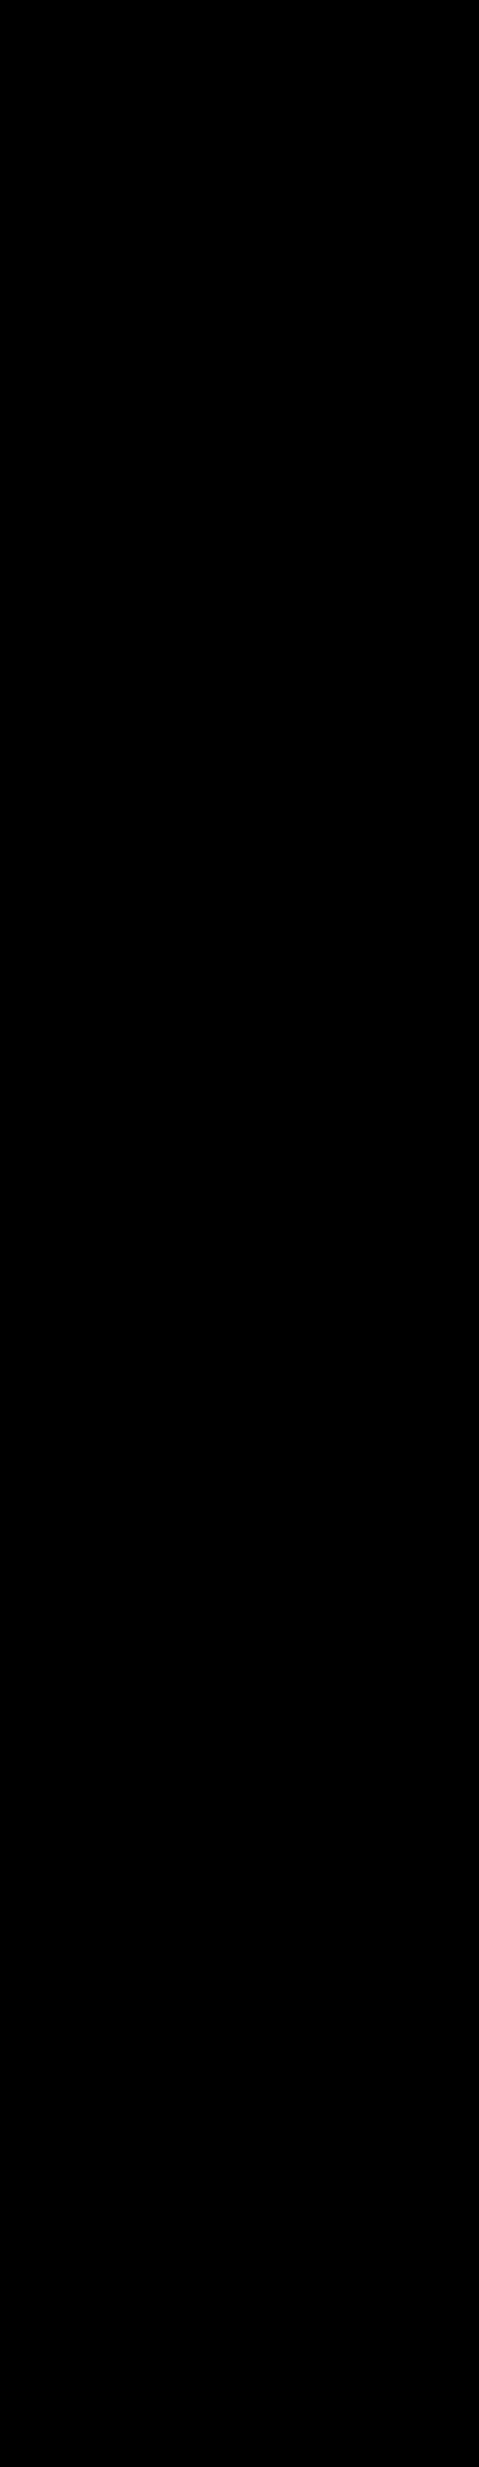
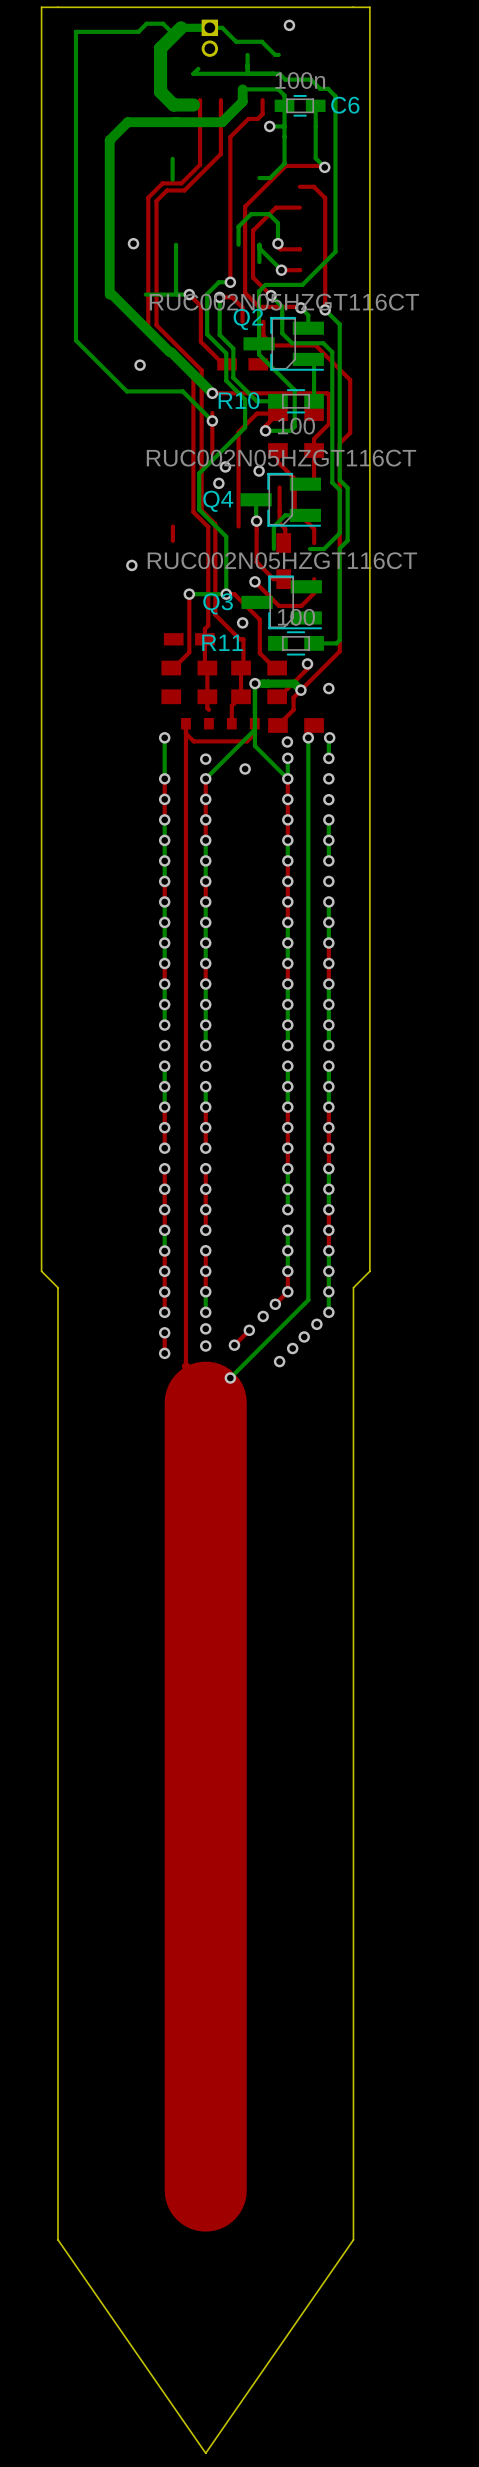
board edge: none -> (369, 7) (41, 7) (41, 1271) (57, 1287) (57, 2239) (205, 2453) (353, 2239) (353, 1287) (369, 1271) (369, 7)
via: none -> (289, 25)
bottom track: none -> (172, 31) (163, 23) (146, 23) (138, 31) (76, 31) (75, 340) (126, 391) (182, 391) (212, 420)
part: none -> (209, 38)
bottom track: none -> (247, 54) (247, 73)
bottom track: none -> (278, 54) (275, 54) (261, 41) (236, 41) (222, 27) (181, 27) (160, 48) (160, 91) (173, 104) (193, 104)
bottom track: none -> (198, 68) (193, 73) (279, 73) (285, 79) (310, 79) (320, 88) (328, 88) (335, 96) (335, 251) (302, 284) (265, 284) (259, 291) (259, 354) (294, 390) (294, 426) (290, 430) (265, 430)
top track: none -> (200, 100) (200, 164) (181, 183) (162, 183) (148, 197) (148, 327) (193, 372) (193, 512) (208, 526) (208, 625) (204, 628) (204, 665) (207, 668) (207, 708) (209, 709)
top track: none -> (220, 100) (220, 154) (184, 190) (167, 190) (156, 201) (156, 325) (201, 370) (201, 510) (215, 524) (215, 614) (239, 639) (243, 639) (241, 696) (231, 705) (231, 723)
top track: none -> (262, 100) (262, 114) (257, 118) (248, 118) (230, 136) (230, 282)
C6: none -> 100n (300, 105)
bottom track: none -> (315, 105) (315, 158) (324, 167)
via: none -> (269, 126)
bottom track: none -> (284, 126) (269, 126)
bottom track: none -> (172, 158) (172, 179)
top track: none -> (324, 167) (285, 165) (245, 206) (245, 293) (258, 306) (300, 307)
via: none -> (324, 167)
bottom track: none -> (259, 178) (270, 178) (284, 163) (284, 95) (278, 89) (242, 89) (242, 101) (222, 122) (127, 122) (109, 140) (109, 294) (112, 294) (212, 393)
top track: none -> (299, 186) (313, 186) (325, 198) (325, 309)
top track: none -> (299, 207) (276, 207) (253, 230) (253, 277) (271, 295)
via: none -> (133, 243)
bottom track: none -> (277, 243) (277, 223) (269, 214) (251, 214) (238, 226) (238, 244)
top track: none -> (277, 243) (280, 249) (299, 249)
via: none -> (277, 243)
bottom track: none -> (176, 244) (176, 292) (177, 294)
bottom track: none -> (259, 244) (259, 262)
bottom track: none -> (259, 248) (281, 270)
via: none -> (281, 270)
top track: none -> (299, 270) (281, 270)
bottom track: none -> (230, 282) (218, 282) (207, 294) (207, 334) (226, 353) (226, 380) (245, 399) (245, 427) (199, 473) (199, 509) (226, 536) (226, 594) (189, 594)
via: none -> (230, 282)
bottom track: none -> (189, 294) (145, 294)
top track: none -> (189, 294) (200, 306) (200, 341) (223, 364) (227, 364)
via: none -> (189, 294)
bottom track: none -> (271, 295) (282, 306) (282, 333) (292, 343) (323, 343) (332, 352) (332, 482) (339, 490) (339, 533) (323, 549) (309, 549)
via: none -> (271, 295)
bottom track: none -> (219, 297) (219, 334) (233, 348) (233, 377) (256, 401) (277, 401)
top track: none -> (219, 297) (232, 297) (242, 307) (242, 321)
via: none -> (219, 297)
bottom track: none -> (300, 307) (308, 315) (308, 328)
via: none -> (300, 307)
bottom track: none -> (325, 309) (339, 324) (339, 480) (347, 487) (347, 540) (339, 548) (339, 640) (336, 643) (314, 643)
via: none -> (325, 309)
top track: none -> (263, 321) (263, 335) (273, 345) (315, 345) (350, 379) (350, 432) (339, 443) (339, 651) (293, 697) (293, 709) (279, 725)
Q2: none -> RUC002N05HZGT116CT (283, 343)
bottom track: none -> (308, 359) (314, 365) (314, 401)
part: none -> (242, 364)
via: none -> (140, 365)
top track: none -> (212, 393) (327, 393) (328, 424) (314, 438) (314, 487)
via: none -> (212, 393)
R10: none -> 100 (296, 401)
top track: none -> (212, 412) (212, 453)
part: none -> (296, 413)
via: none -> (212, 420)
top track: none -> (265, 430) (265, 426) (277, 413) (256, 413) (238, 431) (238, 526)
via: none -> (265, 430)
top track: none -> (277, 450) (277, 462) (294, 478) (294, 509) (314, 529) (314, 543)
part: none -> (296, 450)
via: none -> (225, 466)
via: none -> (259, 471)
via: none -> (218, 483)
top track: none -> (279, 487) (279, 523) (285, 529) (285, 545)
bottom track: none -> (256, 499) (256, 521)
Q4: none -> RUC002N05HZGT116CT (280, 499)
bottom track: none -> (305, 515) (285, 515) (273, 526) (273, 549)
top track: none -> (256, 521) (256, 562) (273, 579) (285, 579)
via: none -> (256, 521)
top track: none -> (172, 526) (172, 540)
part: none -> (283, 561)
via: none -> (131, 565)
top track: none -> (314, 579) (314, 593) (301, 605) (279, 605) (254, 581)
via: none -> (254, 581)
top track: none -> (189, 594) (189, 652) (173, 668) (171, 668)
via: none -> (189, 594)
top track: none -> (226, 594) (234, 594) (259, 619) (259, 653) (274, 668) (277, 668)
via: none -> (226, 594)
Q3: none -> RUC002N05HZGT116CT (281, 602)
via: none -> (242, 622)
part: none -> (189, 639)
R11: none -> 100 (296, 643)
top track: none -> (307, 663) (307, 668) (279, 696) (277, 696)
via: none -> (307, 663)
part: none -> (189, 668)
part: none -> (259, 668)
via: none -> (254, 683)
via: none -> (328, 688)
bottom track: none -> (300, 690) (294, 683) (254, 683) (254, 746) (287, 778) (287, 758)
via: none -> (300, 690)
part: none -> (189, 696)
part: none -> (259, 696)
top track: none -> (185, 723) (185, 1366) (222, 1402)
part: none -> (197, 723)
part: none -> (243, 723)
top track: none -> (254, 723) (254, 733) (247, 741) (193, 741) (185, 733)
part: none -> (296, 725)
bottom track: none -> (254, 729) (205, 778)
bottom track: none -> (164, 737) (164, 778)
via: none -> (164, 737)
bottom track: none -> (308, 737) (308, 1300) (230, 1378)
via: none -> (308, 737)
bottom track: none -> (329, 737) (328, 758)
via: none -> (329, 737)
via: none -> (287, 741)
via: none -> (287, 758)
via: none -> (328, 758)
via: none -> (205, 759)
via: none -> (245, 768)
top track: none -> (164, 778) (164, 819)
via: none -> (164, 778)
top track: none -> (205, 778) (205, 840)
via: none -> (205, 778)
top track: none -> (287, 778) (287, 840)
via: none -> (287, 778)
via: none -> (328, 778)
via: none -> (164, 799)
via: none -> (205, 799)
via: none -> (287, 799)
via: none -> (328, 799)
bottom track: none -> (164, 819) (164, 881)
via: none -> (164, 819)
via: none -> (205, 819)
via: none -> (287, 819)
bottom track: none -> (328, 819) (328, 860)
via: none -> (328, 819)
via: none -> (164, 840)
bottom track: none -> (205, 840) (205, 881)
via: none -> (205, 840)
bottom track: none -> (287, 840) (287, 860)
via: none -> (287, 840)
via: none -> (328, 840)
via: none -> (164, 860)
via: none -> (205, 860)
top track: none -> (287, 860) (287, 922)
via: none -> (287, 860)
via: none -> (328, 860)
top track: none -> (164, 881) (164, 901)
via: none -> (164, 881)
top track: none -> (205, 881) (205, 901)
via: none -> (205, 881)
via: none -> (287, 881)
via: none -> (328, 881)
bottom track: none -> (164, 901) (164, 963)
via: none -> (164, 901)
bottom track: none -> (205, 901) (205, 963)
via: none -> (205, 901)
via: none -> (287, 901)
bottom track: none -> (328, 901) (328, 943)
via: none -> (328, 901)
via: none -> (164, 922)
via: none -> (205, 922)
bottom track: none -> (287, 922) (287, 963)
via: none -> (287, 922)
via: none -> (328, 922)
via: none -> (164, 943)
via: none -> (205, 943)
via: none -> (287, 943)
top track: none -> (328, 943) (328, 984)
via: none -> (328, 943)
top track: none -> (164, 963) (164, 984)
via: none -> (164, 963)
top track: none -> (205, 963) (205, 984)
via: none -> (205, 963)
top track: none -> (287, 963) (287, 984)
via: none -> (287, 963)
via: none -> (328, 963)
bottom track: none -> (164, 984) (164, 1025)
via: none -> (164, 984)
bottom track: none -> (205, 984) (205, 1045)
via: none -> (205, 984)
bottom track: none -> (287, 984) (287, 1045)
via: none -> (287, 984)
bottom track: none -> (328, 984) (328, 1045)
via: none -> (328, 984)
via: none -> (164, 1004)
via: none -> (205, 1004)
via: none -> (287, 1004)
via: none -> (328, 1004)
via: none -> (164, 1025)
via: none -> (205, 1025)
via: none -> (287, 1025)
via: none -> (328, 1025)
via: none -> (164, 1045)
via: none -> (205, 1045)
via: none -> (287, 1045)
via: none -> (328, 1045)
bottom track: none -> (164, 1066) (164, 1107)
via: none -> (164, 1066)
via: none -> (205, 1066)
bottom track: none -> (287, 1066) (287, 1107)
via: none -> (287, 1066)
bottom track: none -> (328, 1066) (328, 1107)
via: none -> (328, 1066)
via: none -> (164, 1086)
bottom track: none -> (205, 1086) (205, 1107)
via: none -> (205, 1086)
via: none -> (287, 1086)
via: none -> (328, 1086)
top track: none -> (164, 1107) (164, 1148)
via: none -> (164, 1107)
top track: none -> (205, 1107) (205, 1148)
via: none -> (205, 1107)
top track: none -> (287, 1107) (287, 1168)
via: none -> (287, 1107)
top track: none -> (328, 1107) (328, 1168)
via: none -> (328, 1107)
via: none -> (164, 1127)
via: none -> (205, 1127)
via: none -> (287, 1127)
via: none -> (328, 1127)
via: none -> (164, 1148)
via: none -> (205, 1148)
via: none -> (287, 1148)
via: none -> (328, 1148)
top track: none -> (164, 1168) (164, 1230)
via: none -> (164, 1168)
top track: none -> (205, 1168) (205, 1230)
via: none -> (205, 1168)
bottom track: none -> (287, 1168) (287, 1209)
via: none -> (287, 1168)
bottom track: none -> (328, 1168) (328, 1209)
via: none -> (328, 1168)
via: none -> (164, 1189)
via: none -> (205, 1189)
via: none -> (287, 1189)
via: none -> (328, 1189)
via: none -> (164, 1209)
via: none -> (205, 1209)
via: none -> (287, 1209)
top track: none -> (328, 1209) (328, 1250)
via: none -> (328, 1209)
bottom track: none -> (164, 1230) (164, 1251)
via: none -> (164, 1230)
via: none -> (205, 1230)
bottom track: none -> (287, 1230) (287, 1271)
via: none -> (287, 1230)
via: none -> (328, 1230)
top track: none -> (205, 1250) (205, 1291)
via: none -> (205, 1250)
via: none -> (287, 1250)
bottom track: none -> (328, 1250) (328, 1312)
via: none -> (328, 1250)
top track: none -> (164, 1251) (164, 1312)
via: none -> (164, 1251)
via: none -> (164, 1271)
via: none -> (205, 1271)
top track: none -> (287, 1271) (287, 1291) (275, 1304)
via: none -> (287, 1271)
via: none -> (328, 1271)
bottom track: none -> (205, 1291) (205, 1312)
via: none -> (205, 1291)
via: none -> (287, 1291)
via: none -> (328, 1291)
via: none -> (164, 1292)
via: none -> (275, 1304)
via: none -> (164, 1312)
via: none -> (205, 1312)
via: none -> (328, 1312)
via: none -> (263, 1316)
via: none -> (316, 1324)
via: none -> (205, 1328)
top track: none -> (249, 1330) (234, 1345)
via: none -> (249, 1330)
top track: none -> (164, 1332) (164, 1353)
via: none -> (164, 1332)
via: none -> (304, 1336)
via: none -> (234, 1345)
via: none -> (205, 1346)
via: none -> (292, 1348)
via: none -> (164, 1353)
via: none -> (279, 1361)
via: none -> (230, 1378)
top track: none -> (205, 1402) (205, 2190)

